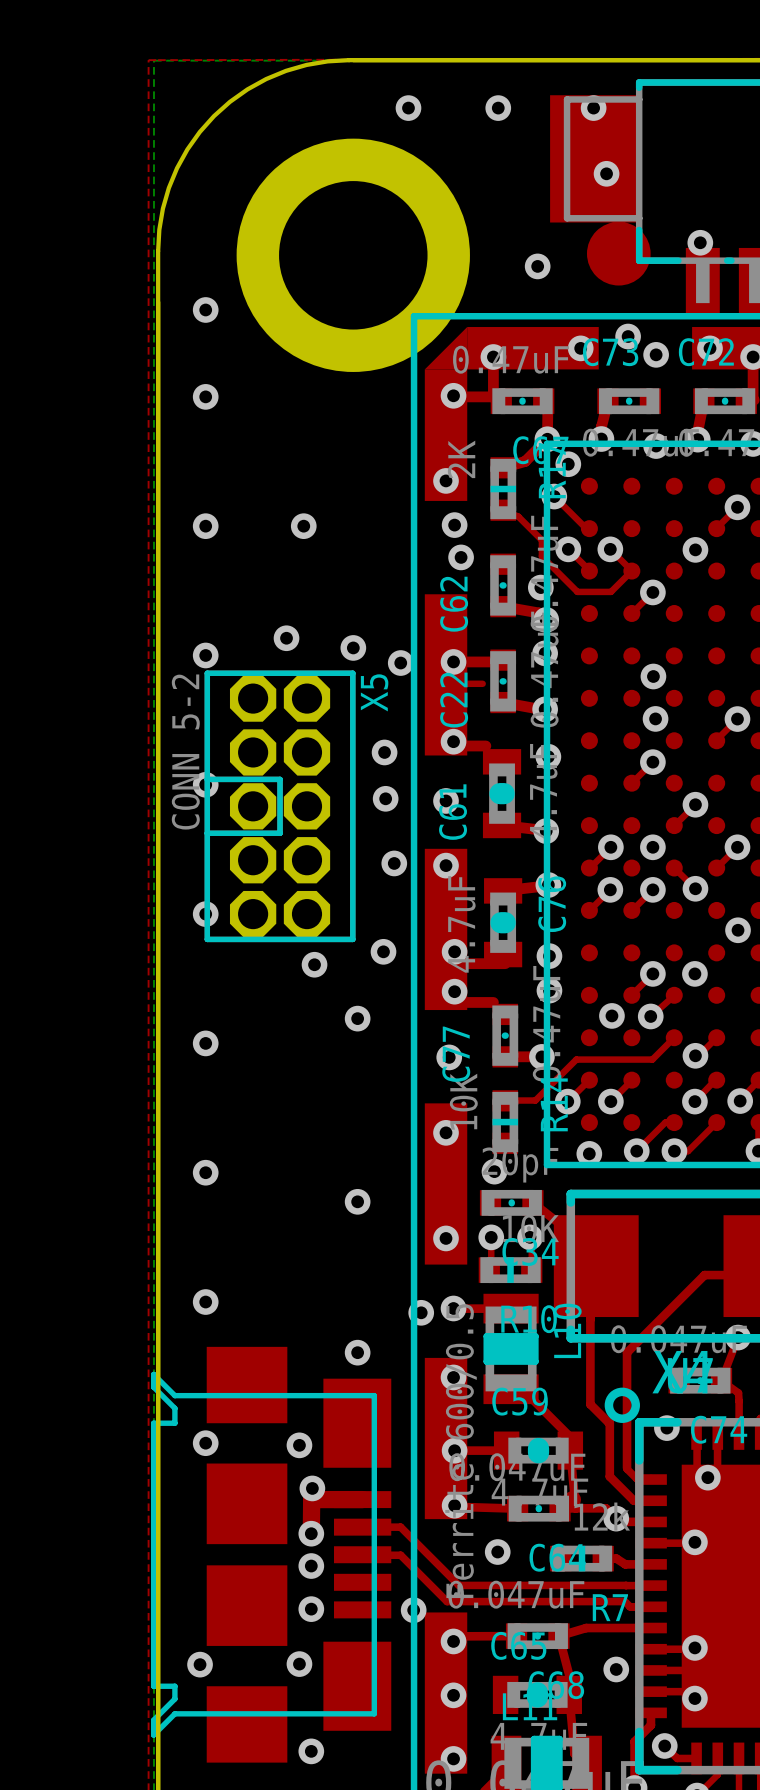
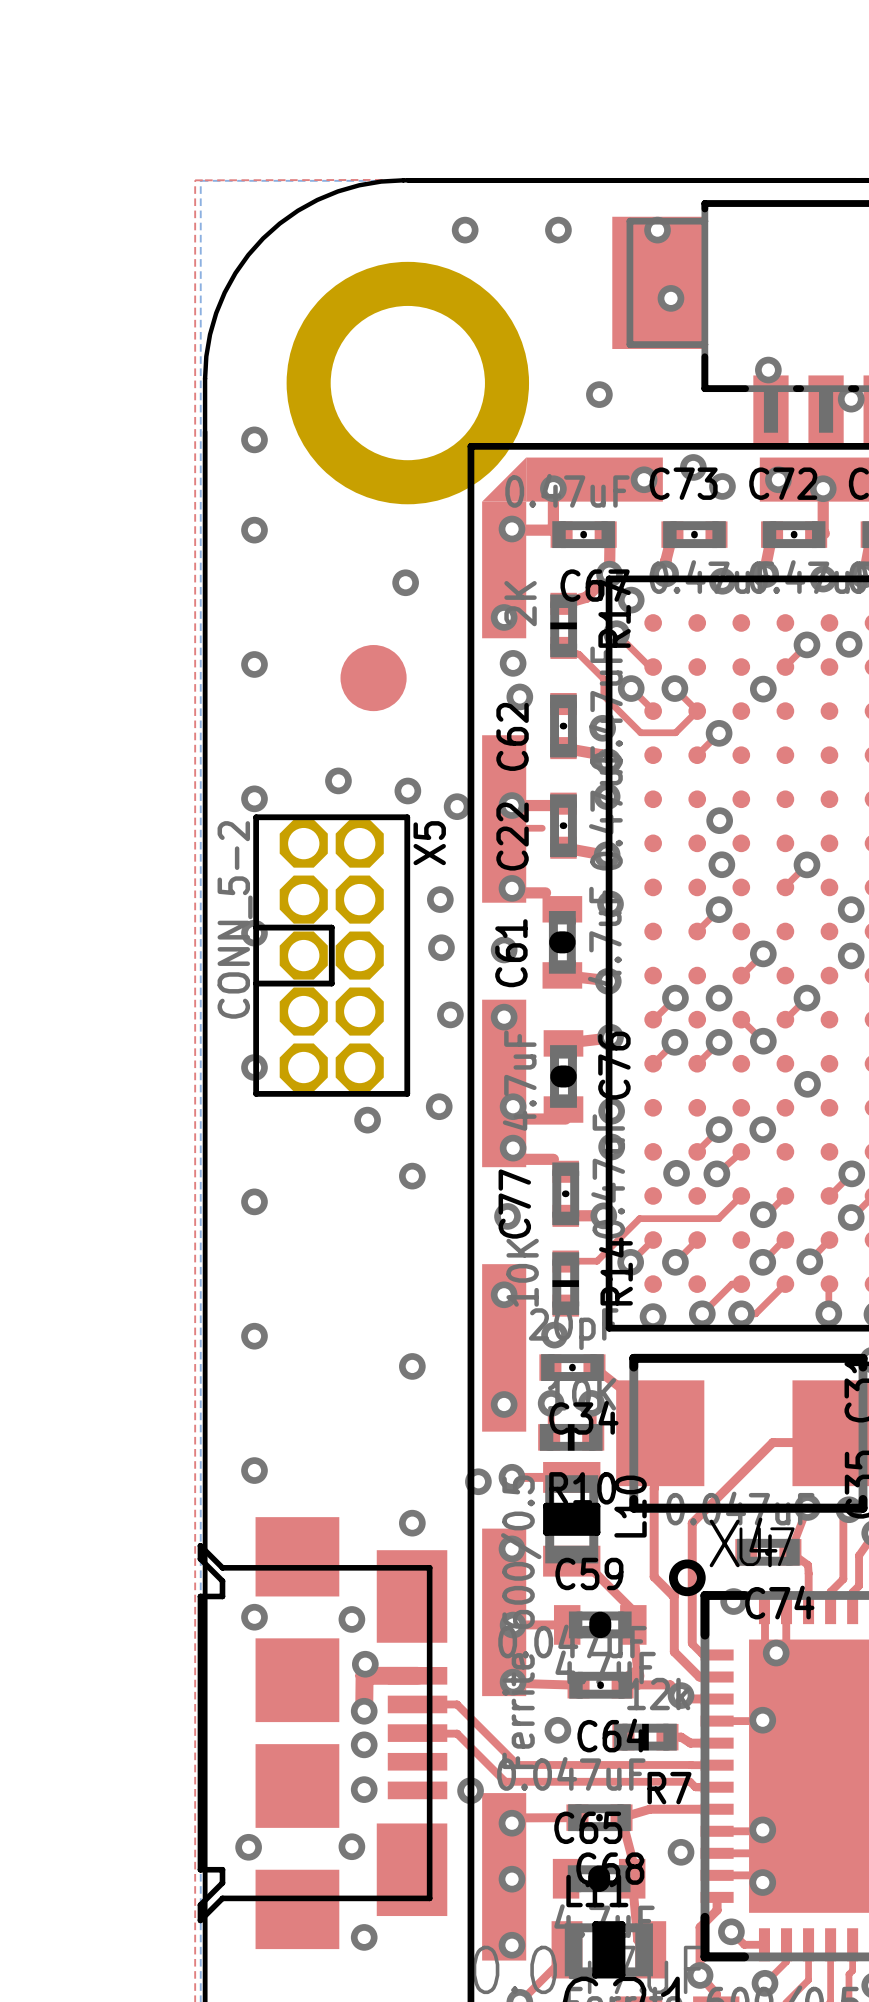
part position: (618, 253) -> (373, 678)
via position: (303, 526) -> (405, 582)

